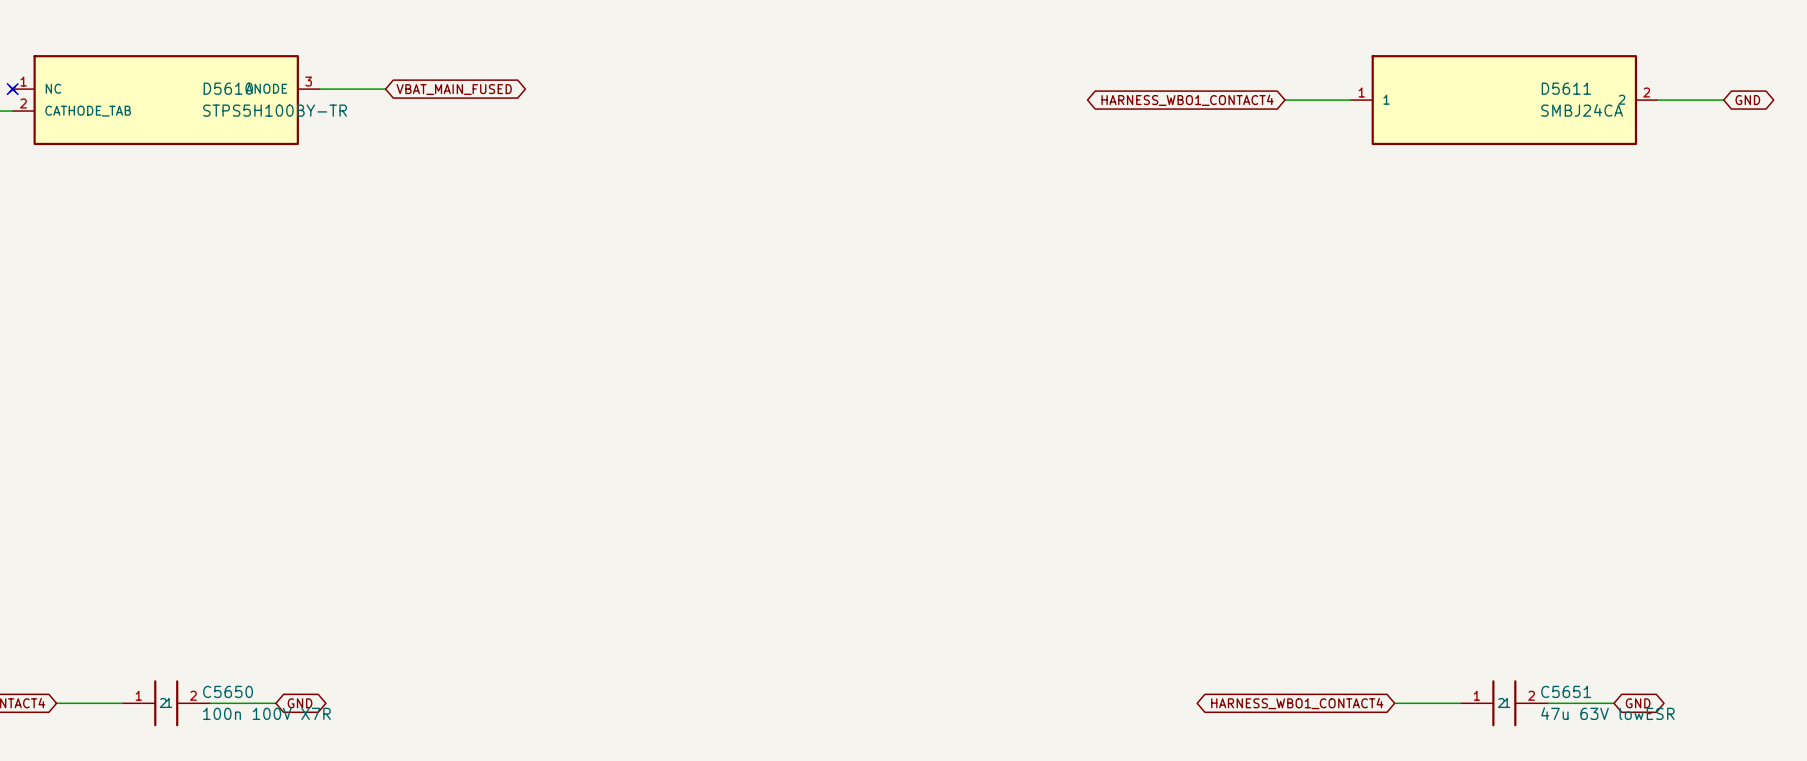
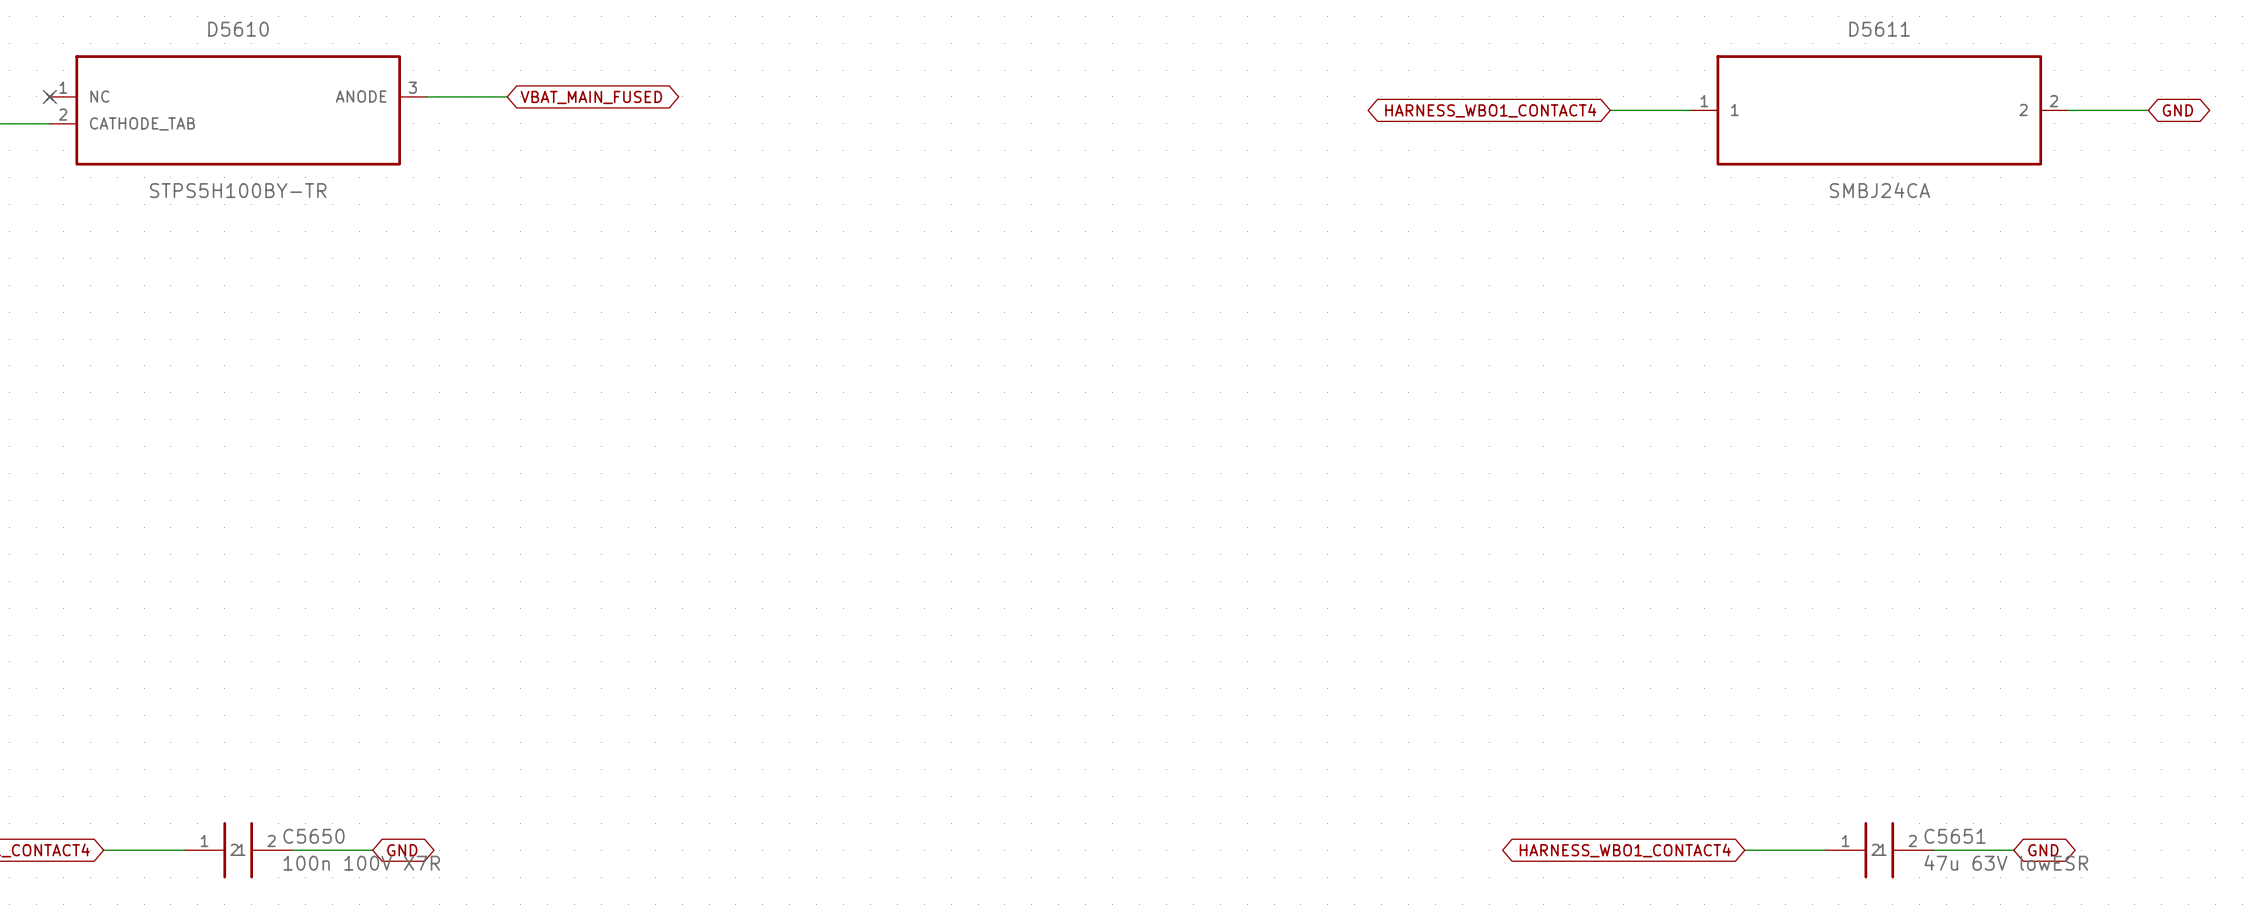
D5610 name position: D5610 (228, 88) -> D5610 (238, 29)
D5611 name position: D5611 (1566, 88) -> D5611 (1879, 29)
D5610 value position: STPS5H100BY-TR (275, 110) -> STPS5H100BY-TR (238, 190)
D5611 value position: SMBJ24CA (1582, 110) -> SMBJ24CA (1879, 190)

